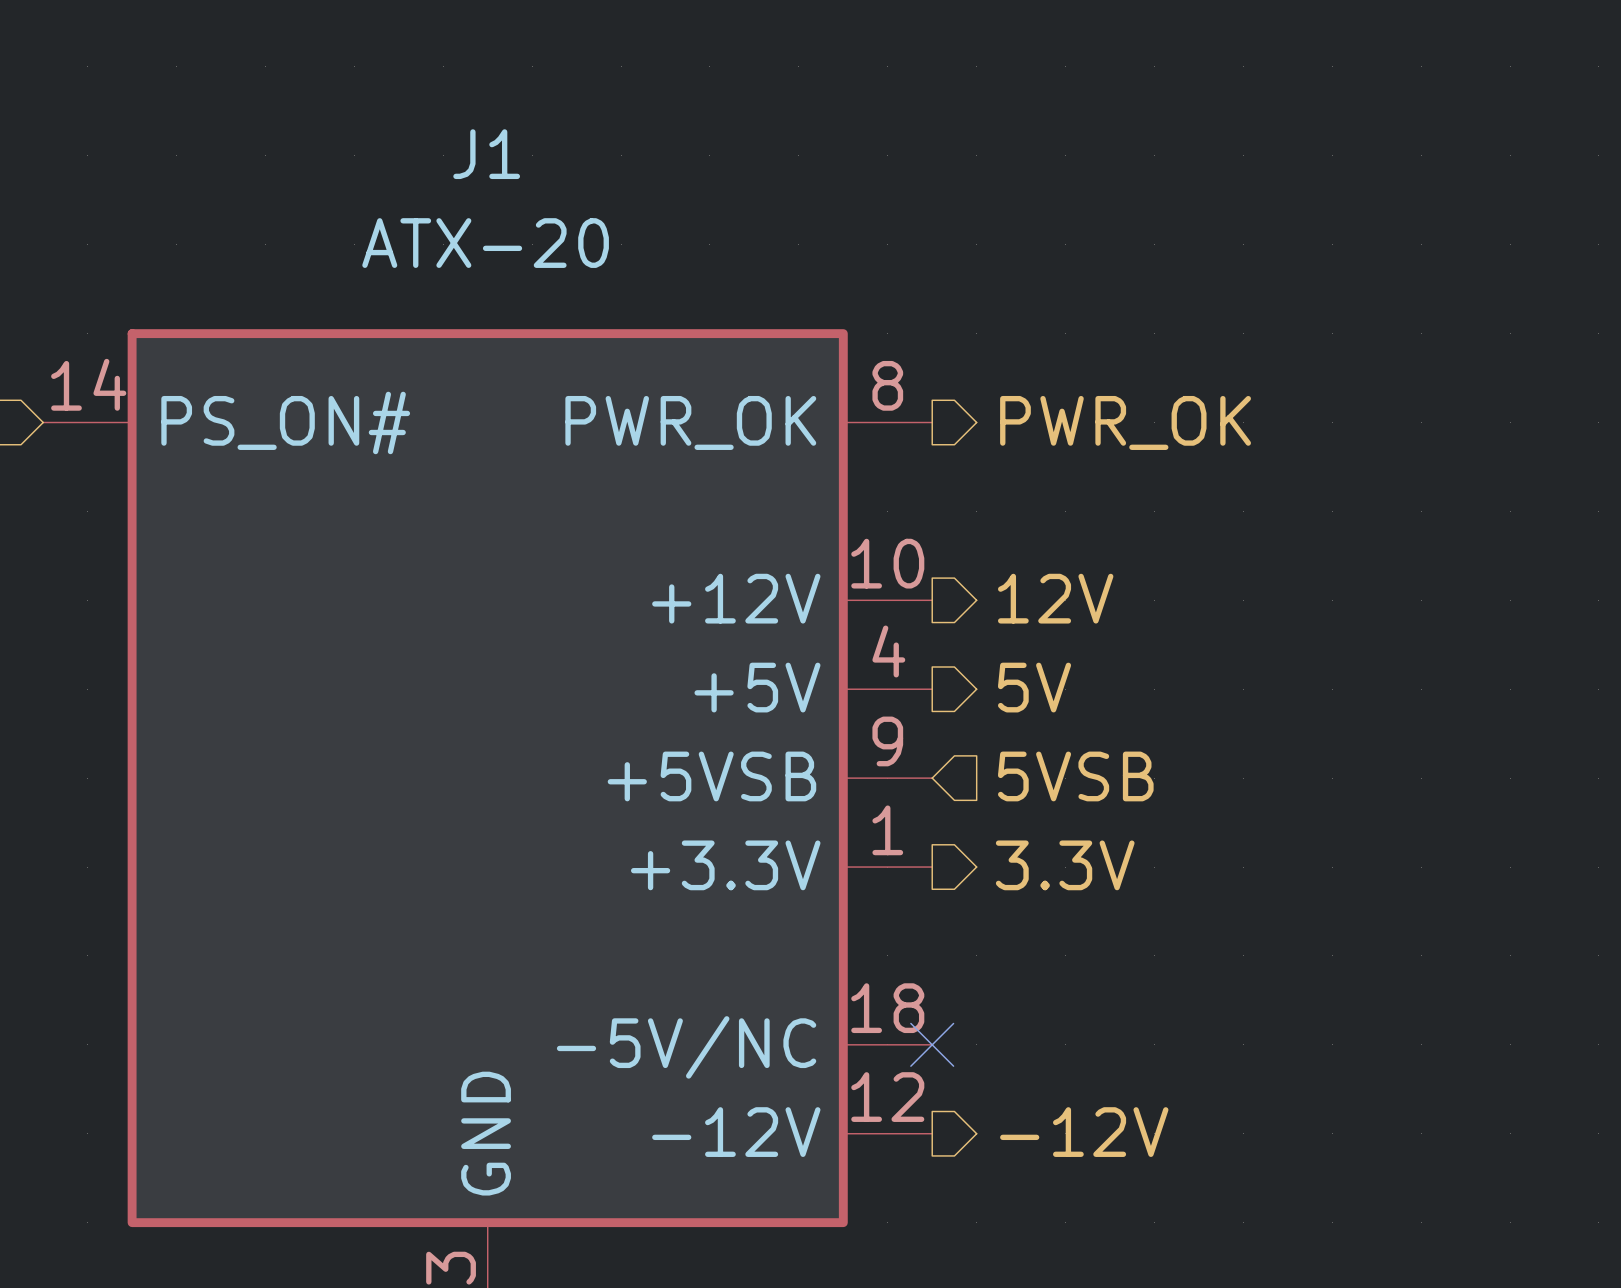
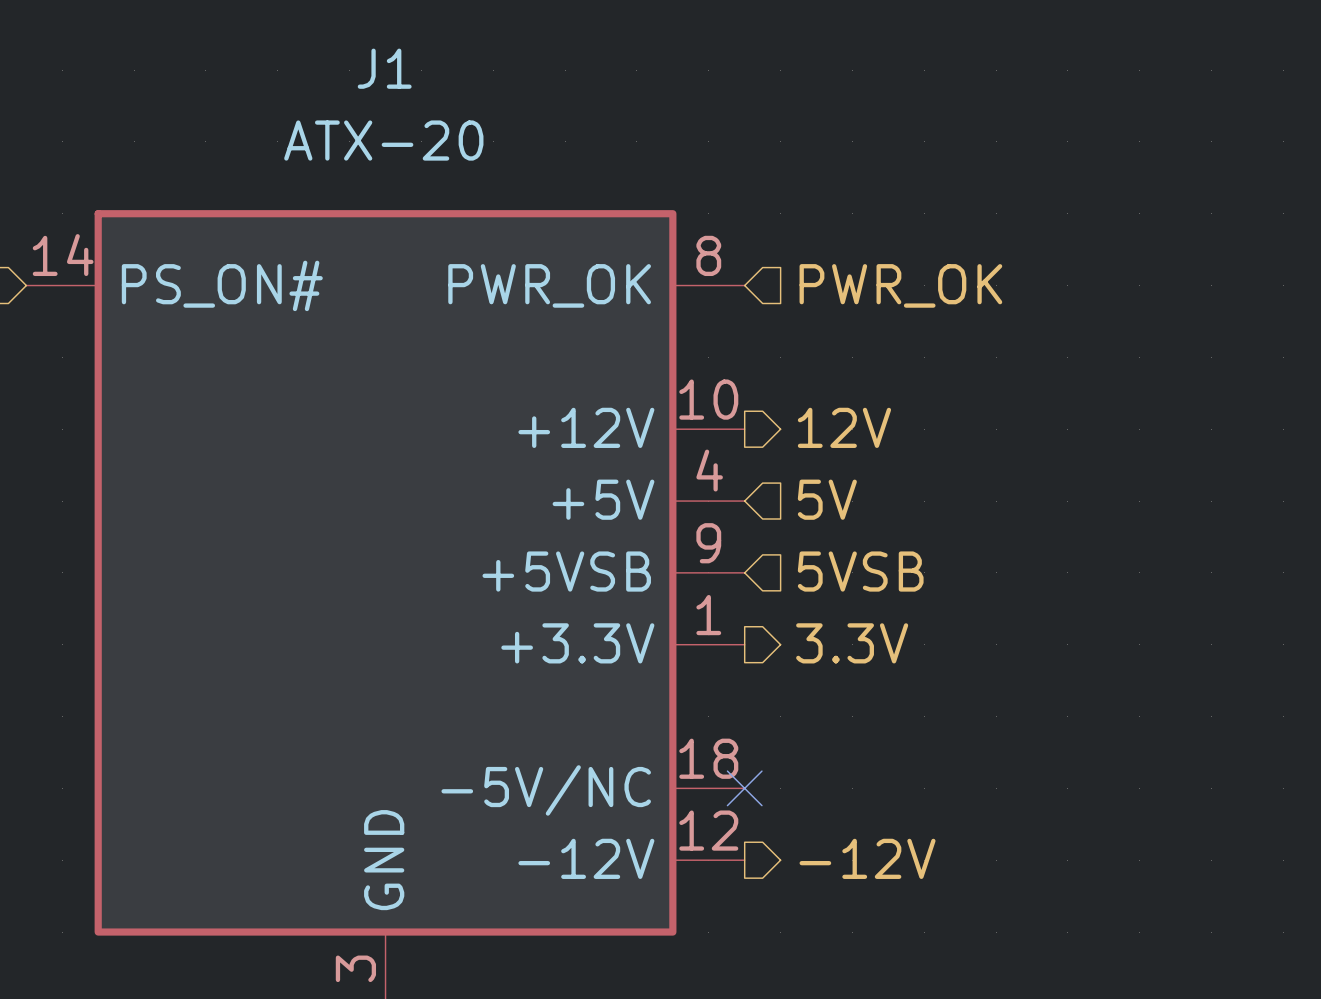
hierarchical label shape: output (1125, 422) -> input (900, 285)
hierarchical label shape: output (1034, 687) -> input (827, 499)

